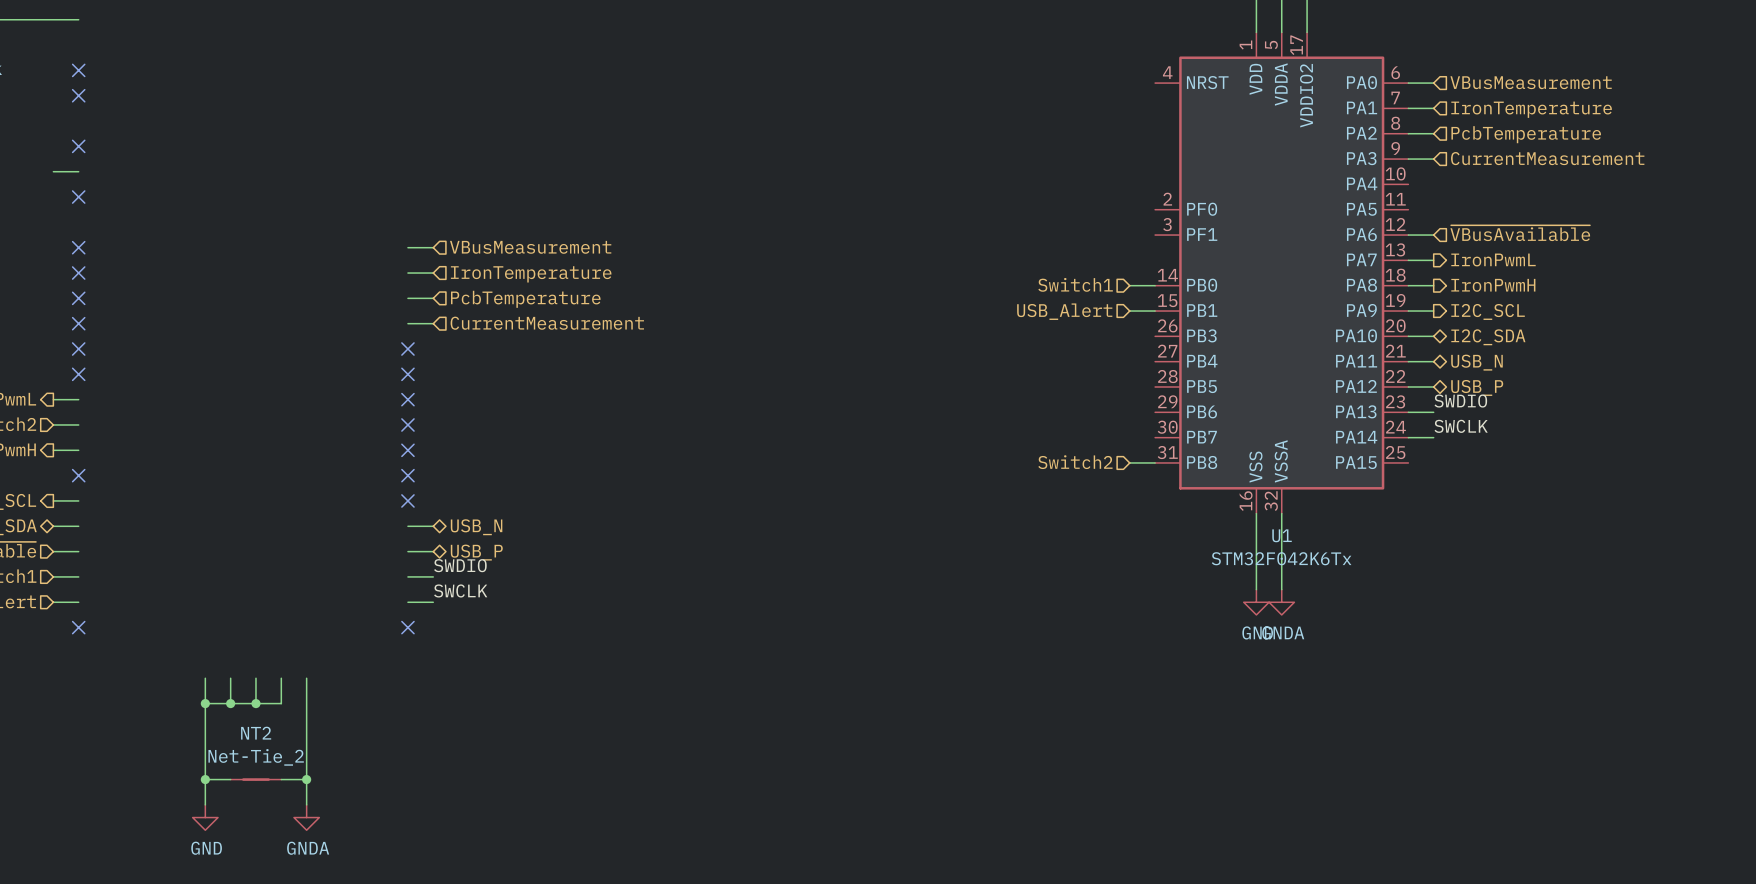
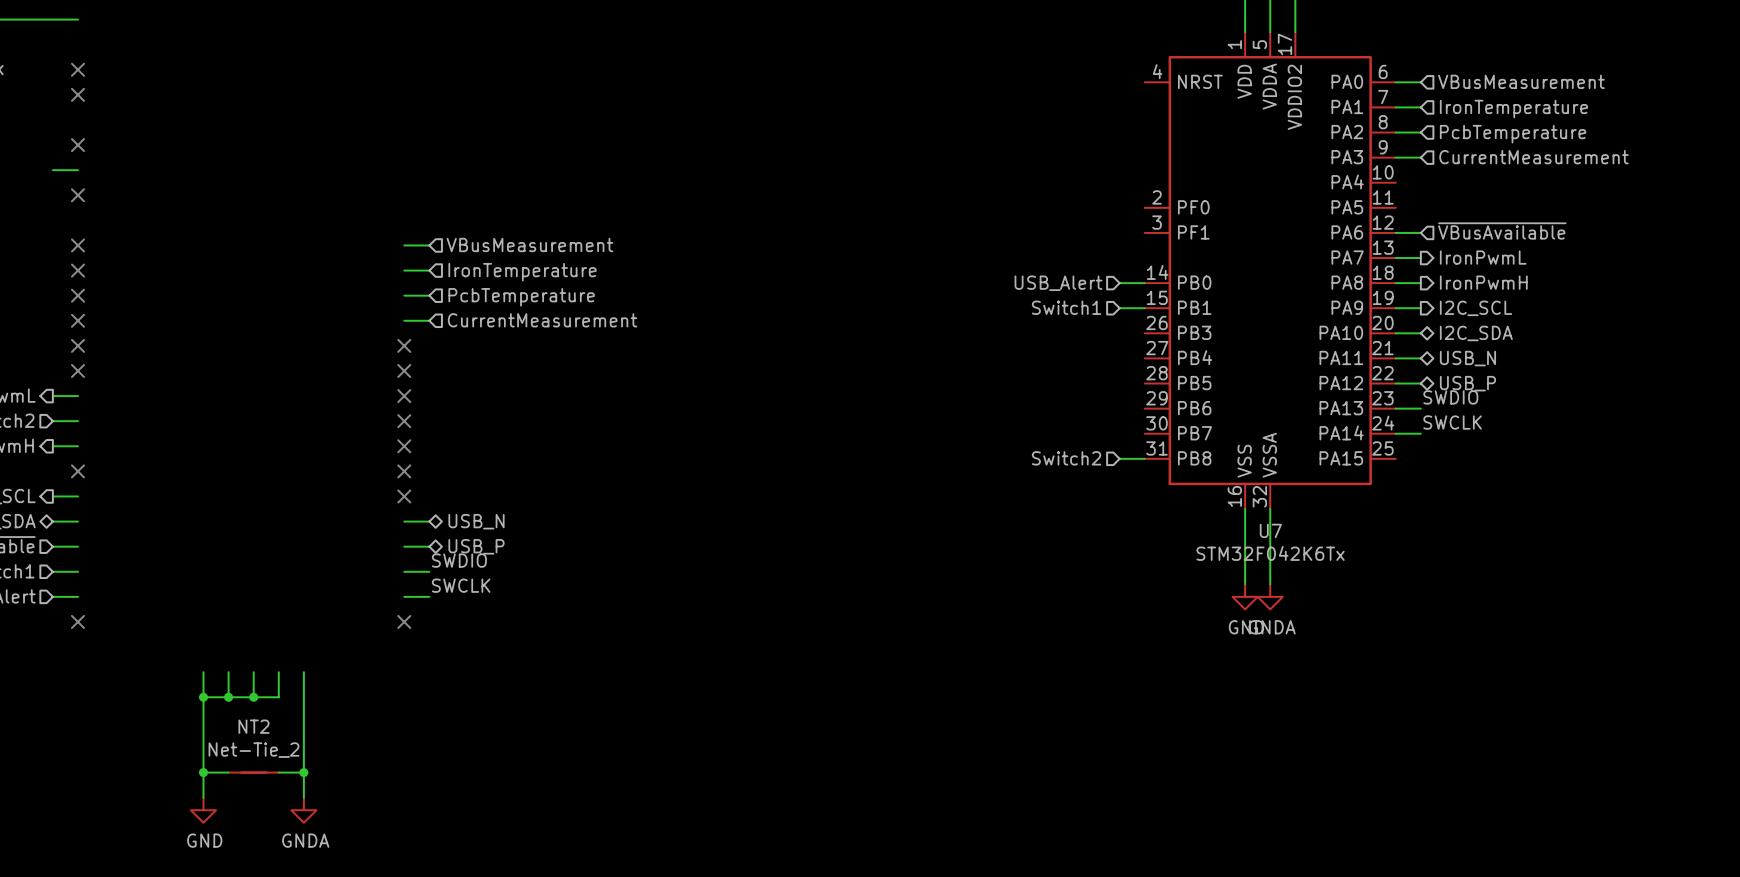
hierarchical label: Switch1 (1075, 284) -> USB_Alert (1058, 283)
hierarchical label: USB_Alert (1064, 311) -> Switch1 (1066, 307)
U1 name: U1 (1282, 535) -> U7 (1270, 530)

